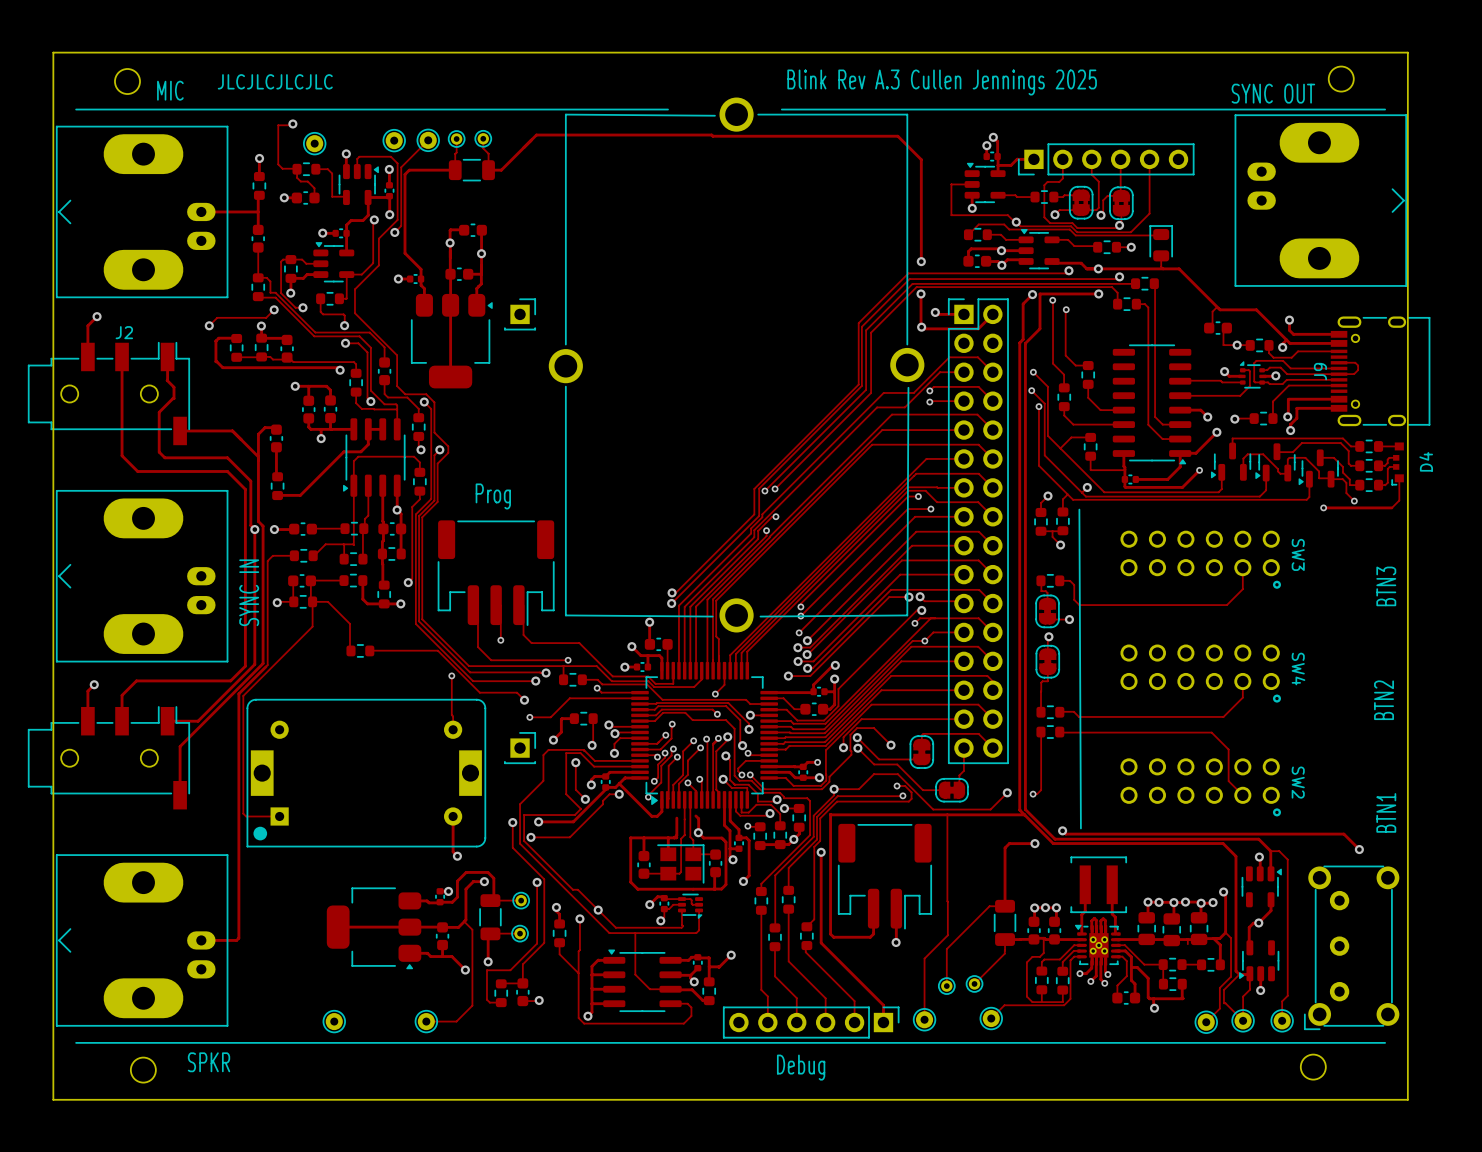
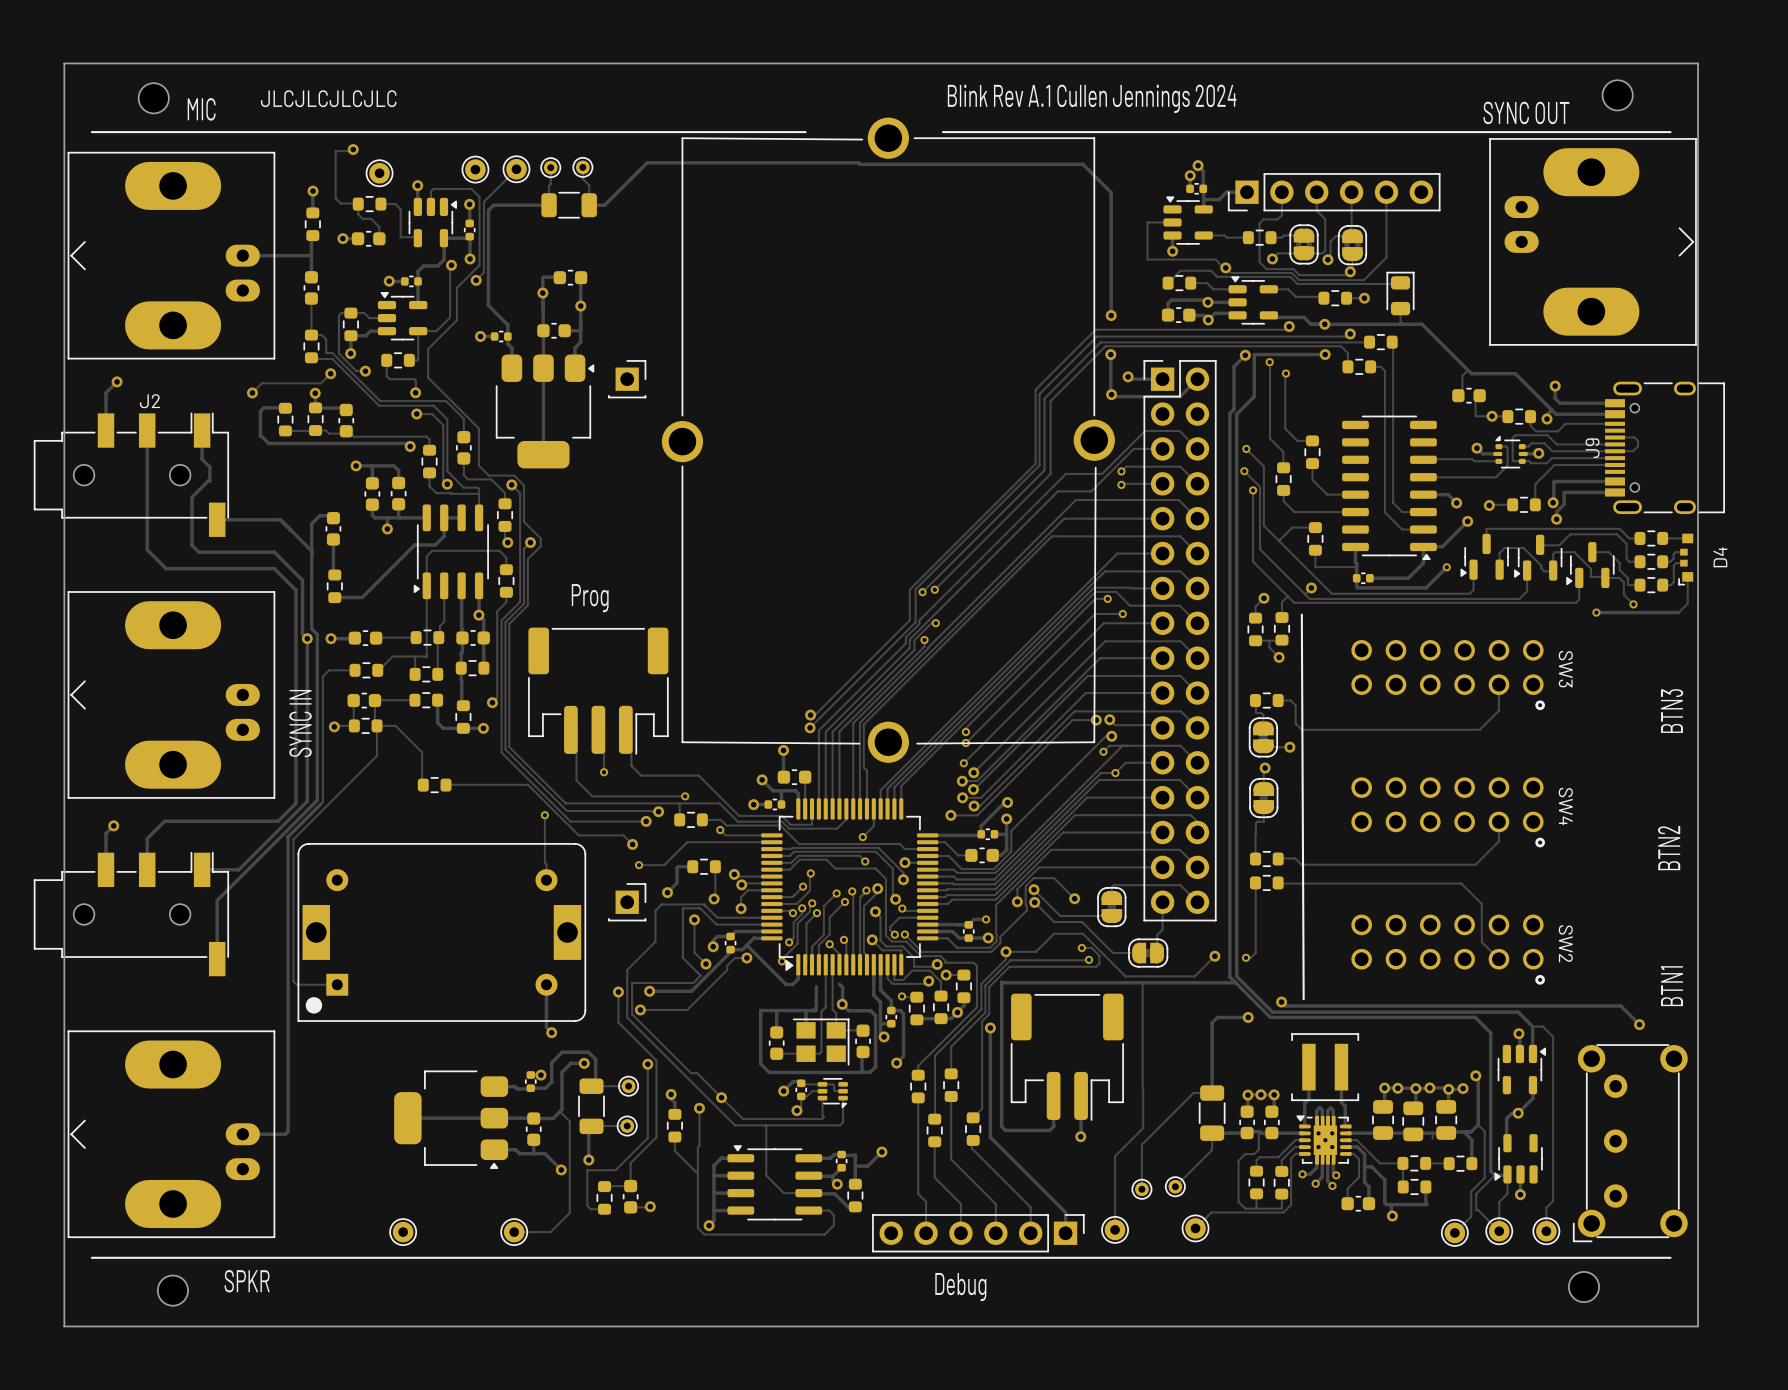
text: Blink Rev A.3 Cullen Jennings 2025 (942, 82) -> Blink Rev A.1 Cullen Jennings 2024 (1092, 98)

